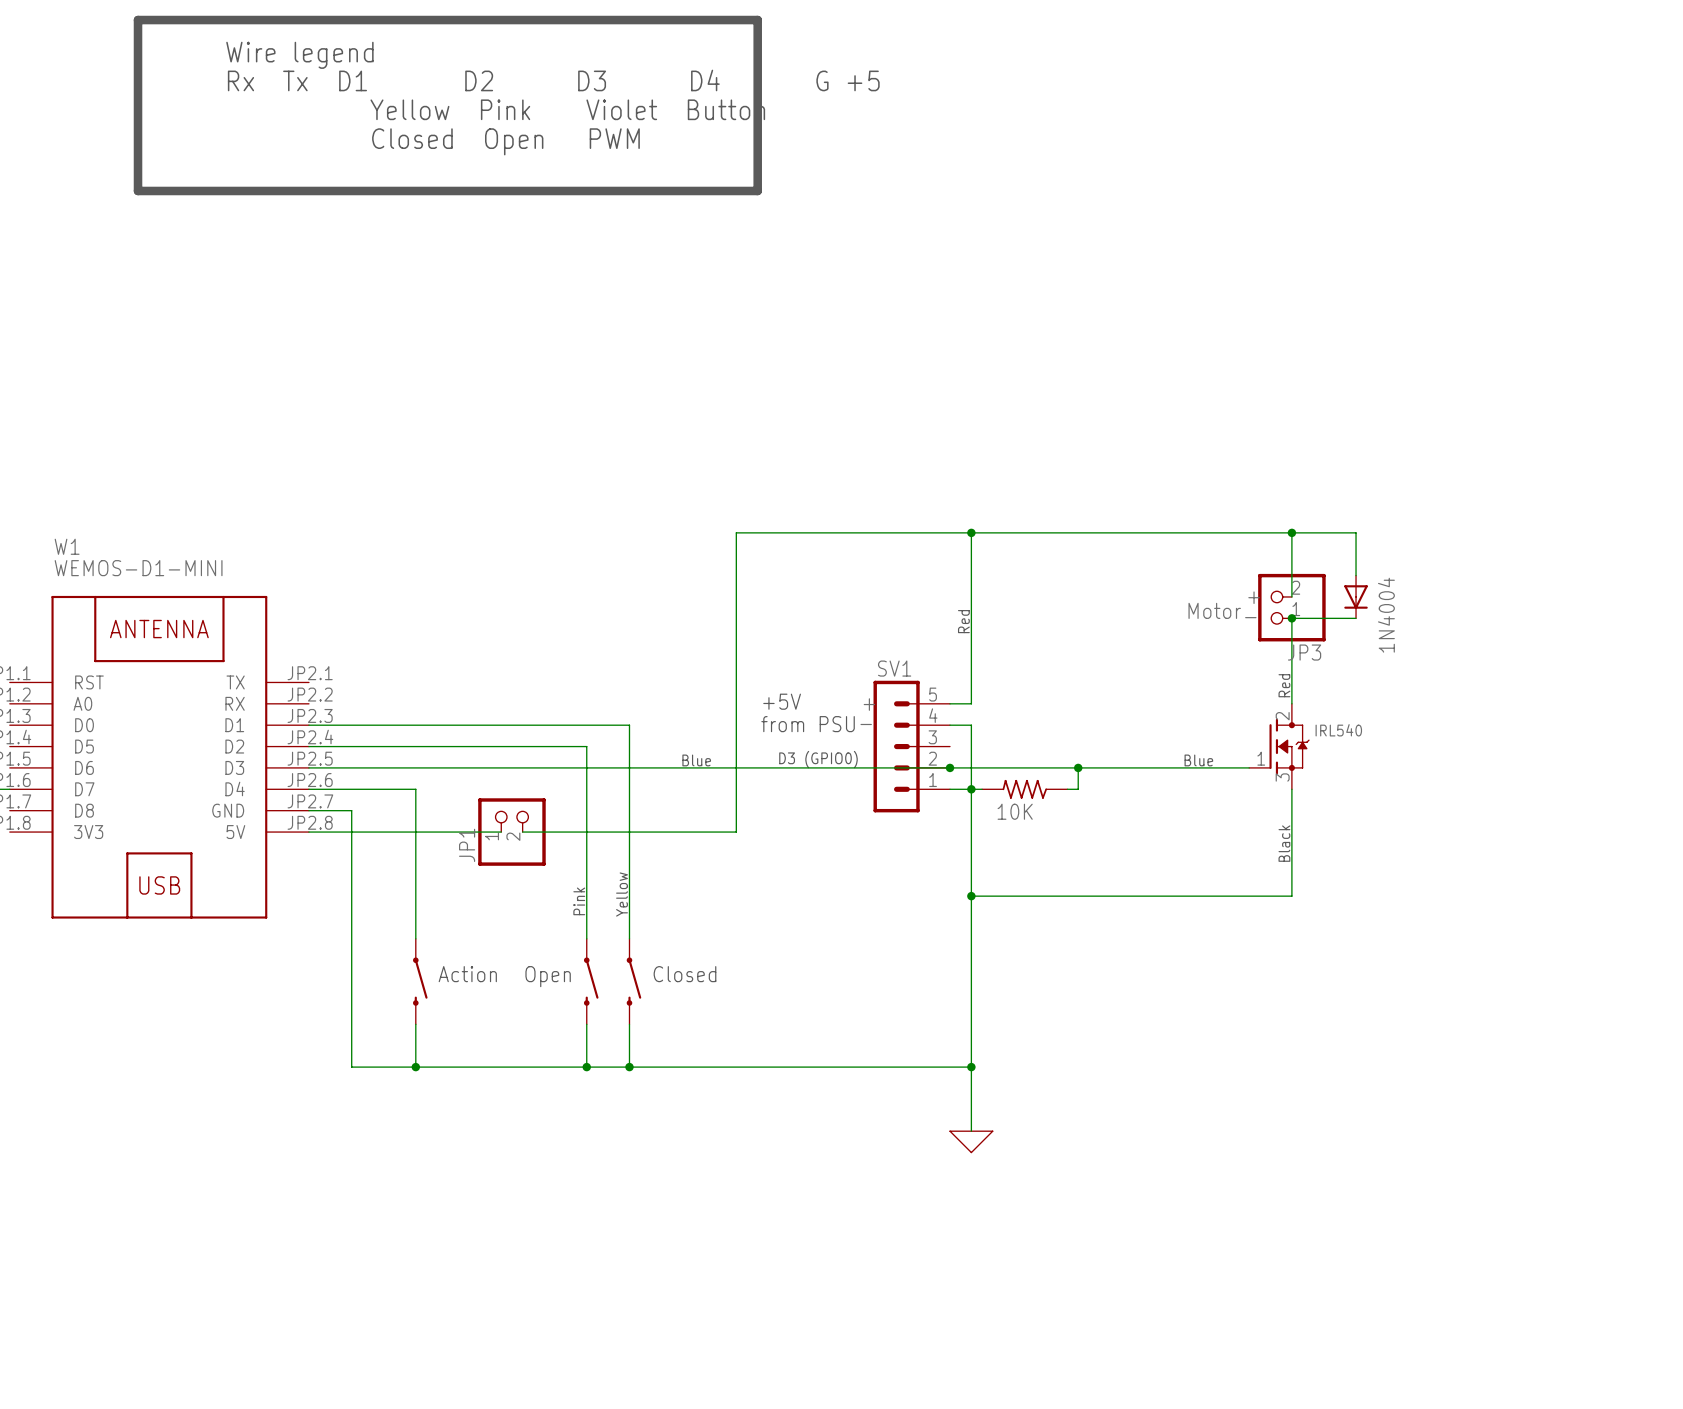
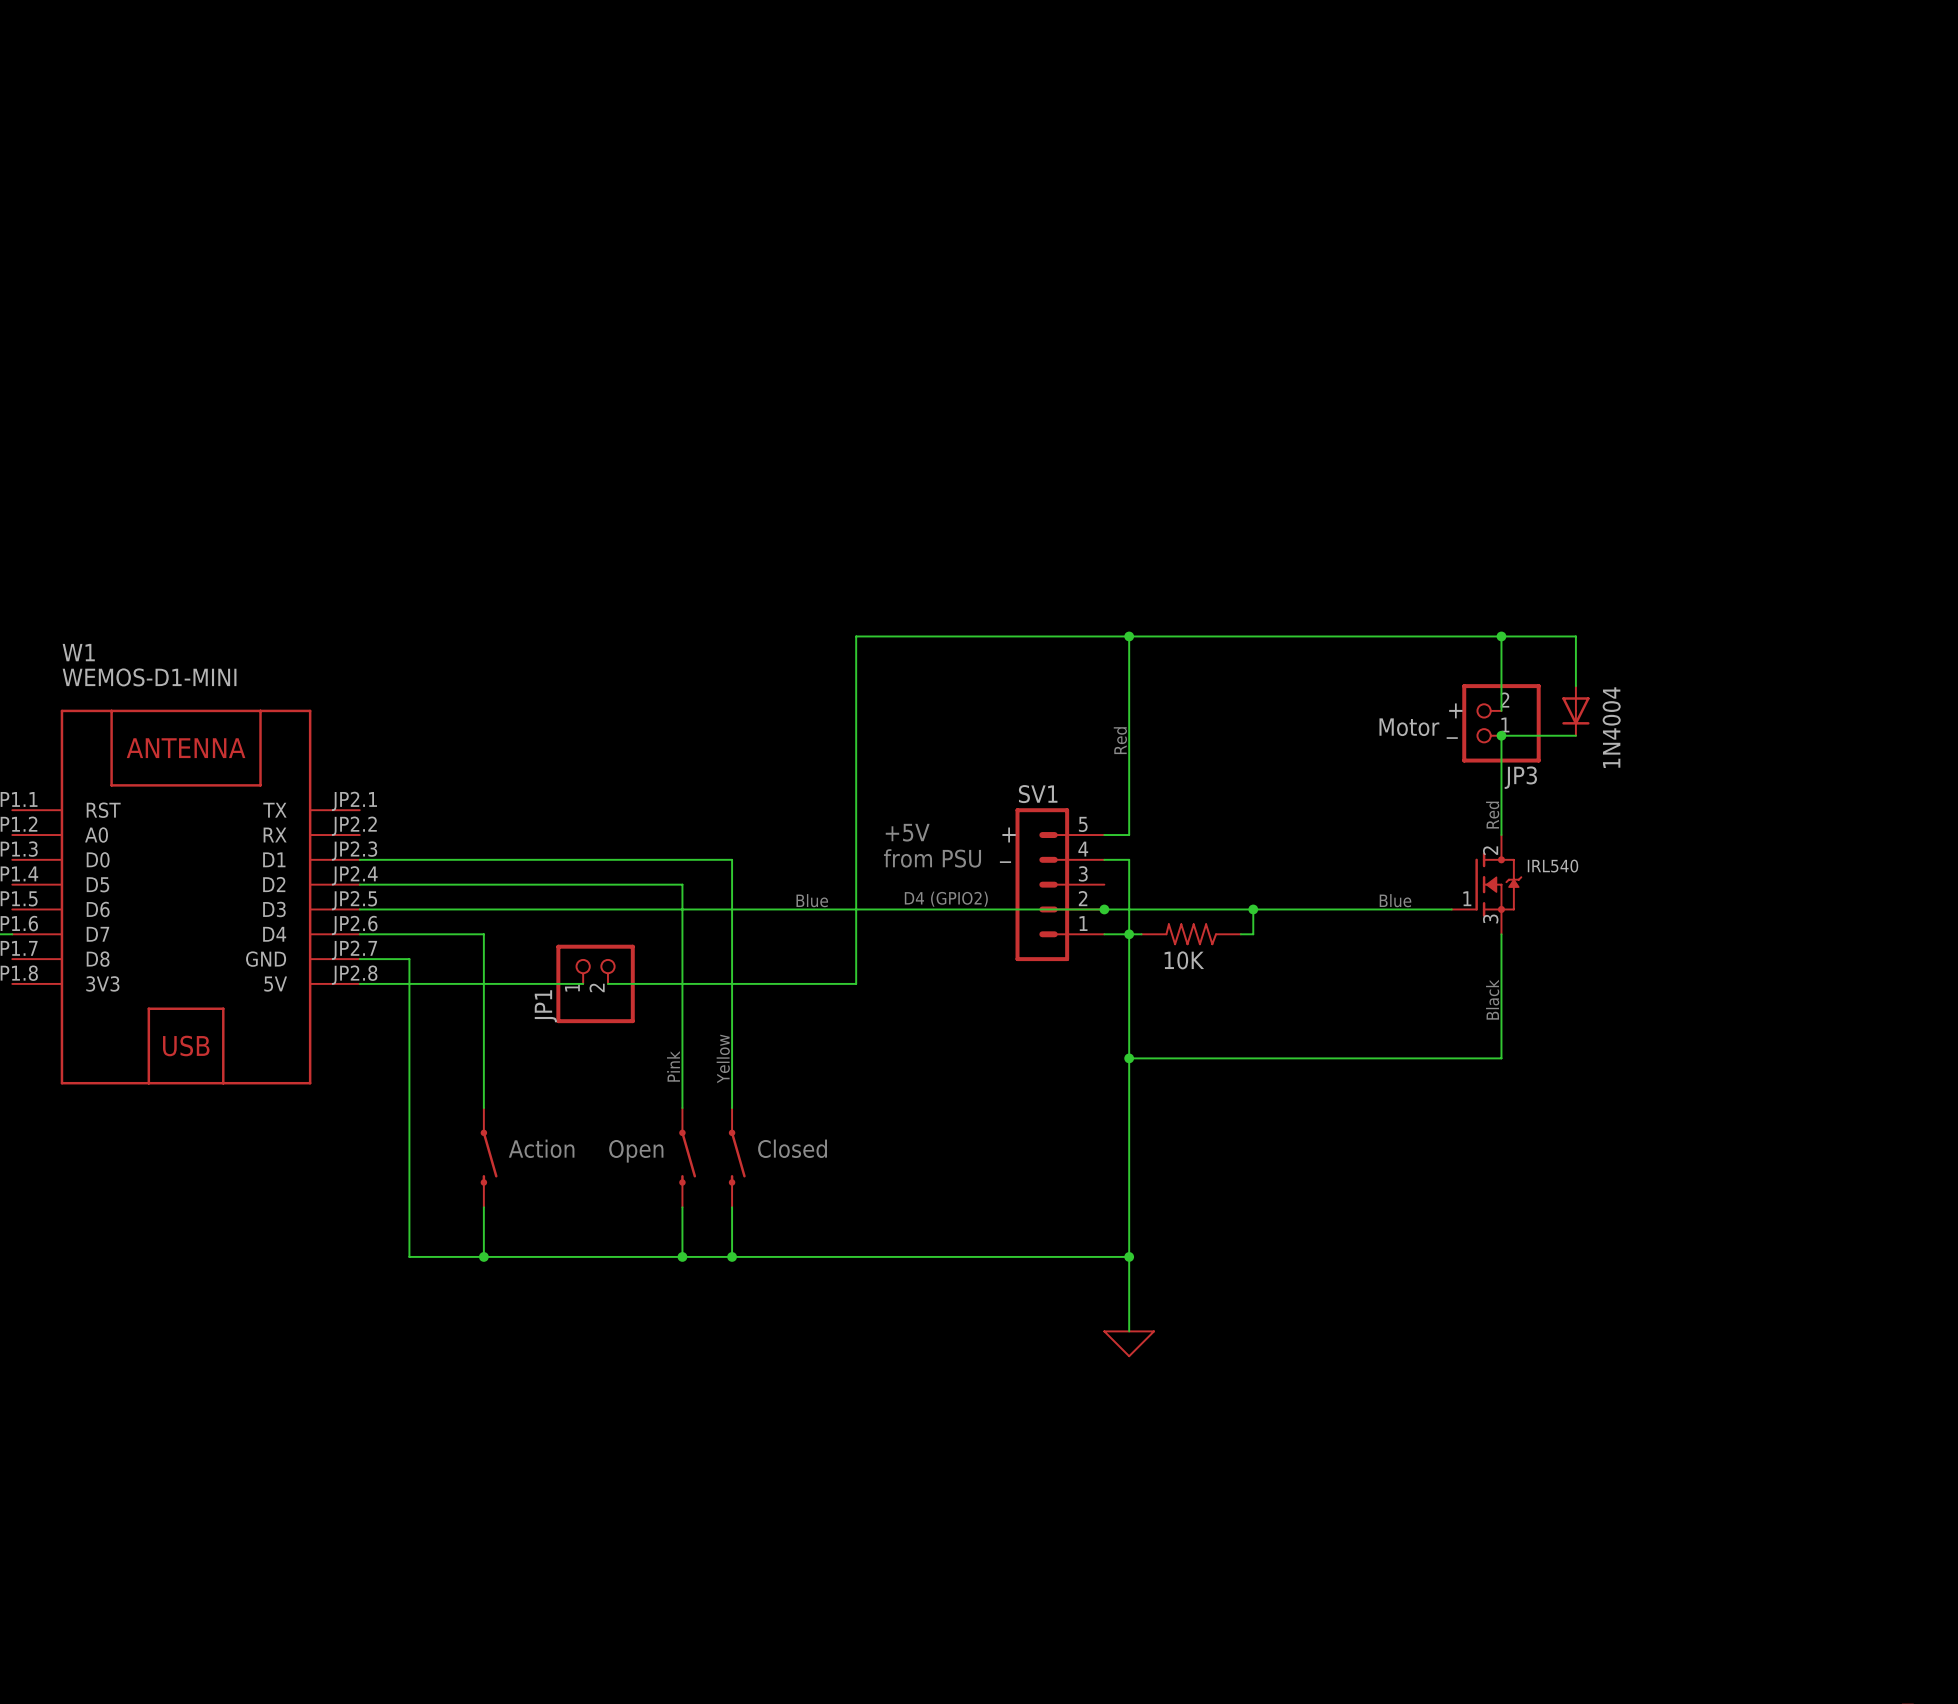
line: (138, 20) (757, 20) (757, 190) (138, 190) (138, 20) -> none
text: Wire legend (299, 55) -> none
text: Rx Tx D1 D2 D3 D4 G +5 (553, 80) -> none
text: Yellow Pink Violet Button (567, 109) -> none
text: Closed Open PWM (505, 141) -> none
text: D3 (GPIO0) (818, 759) -> D4 (GPIO2) (946, 899)

